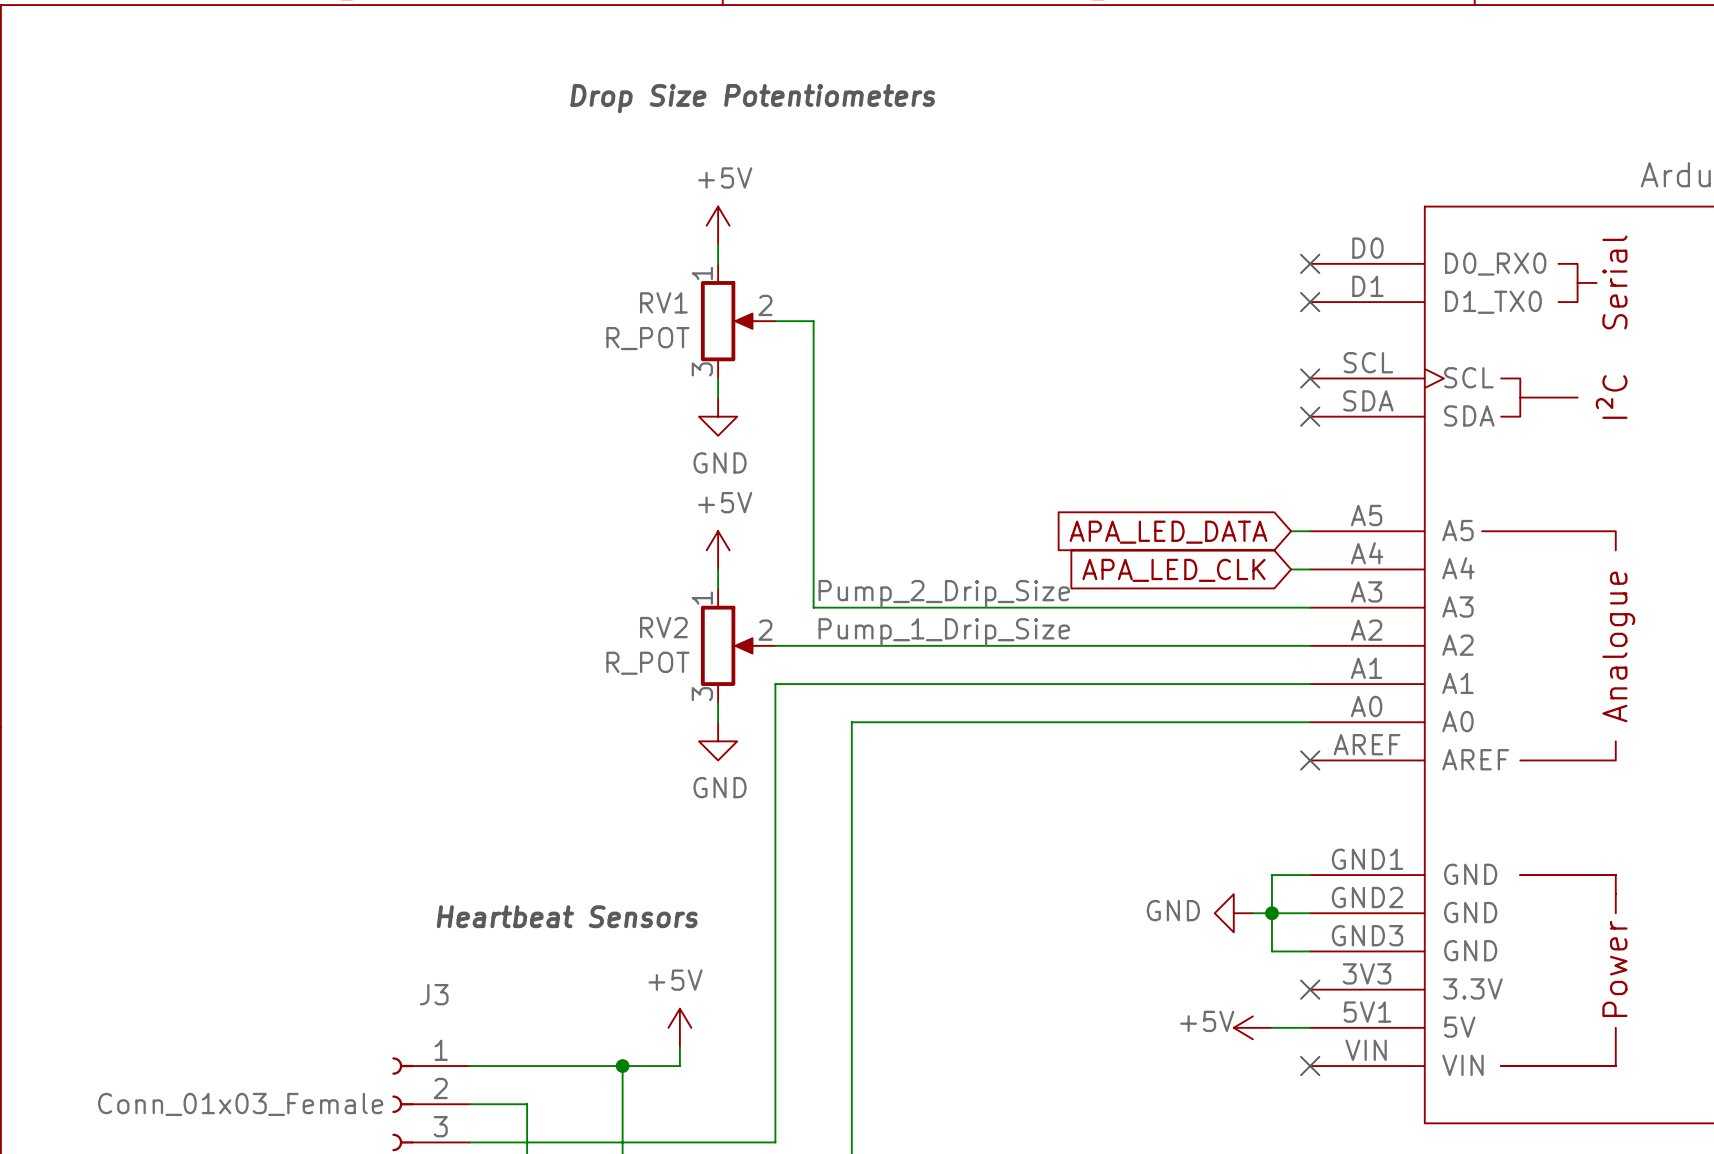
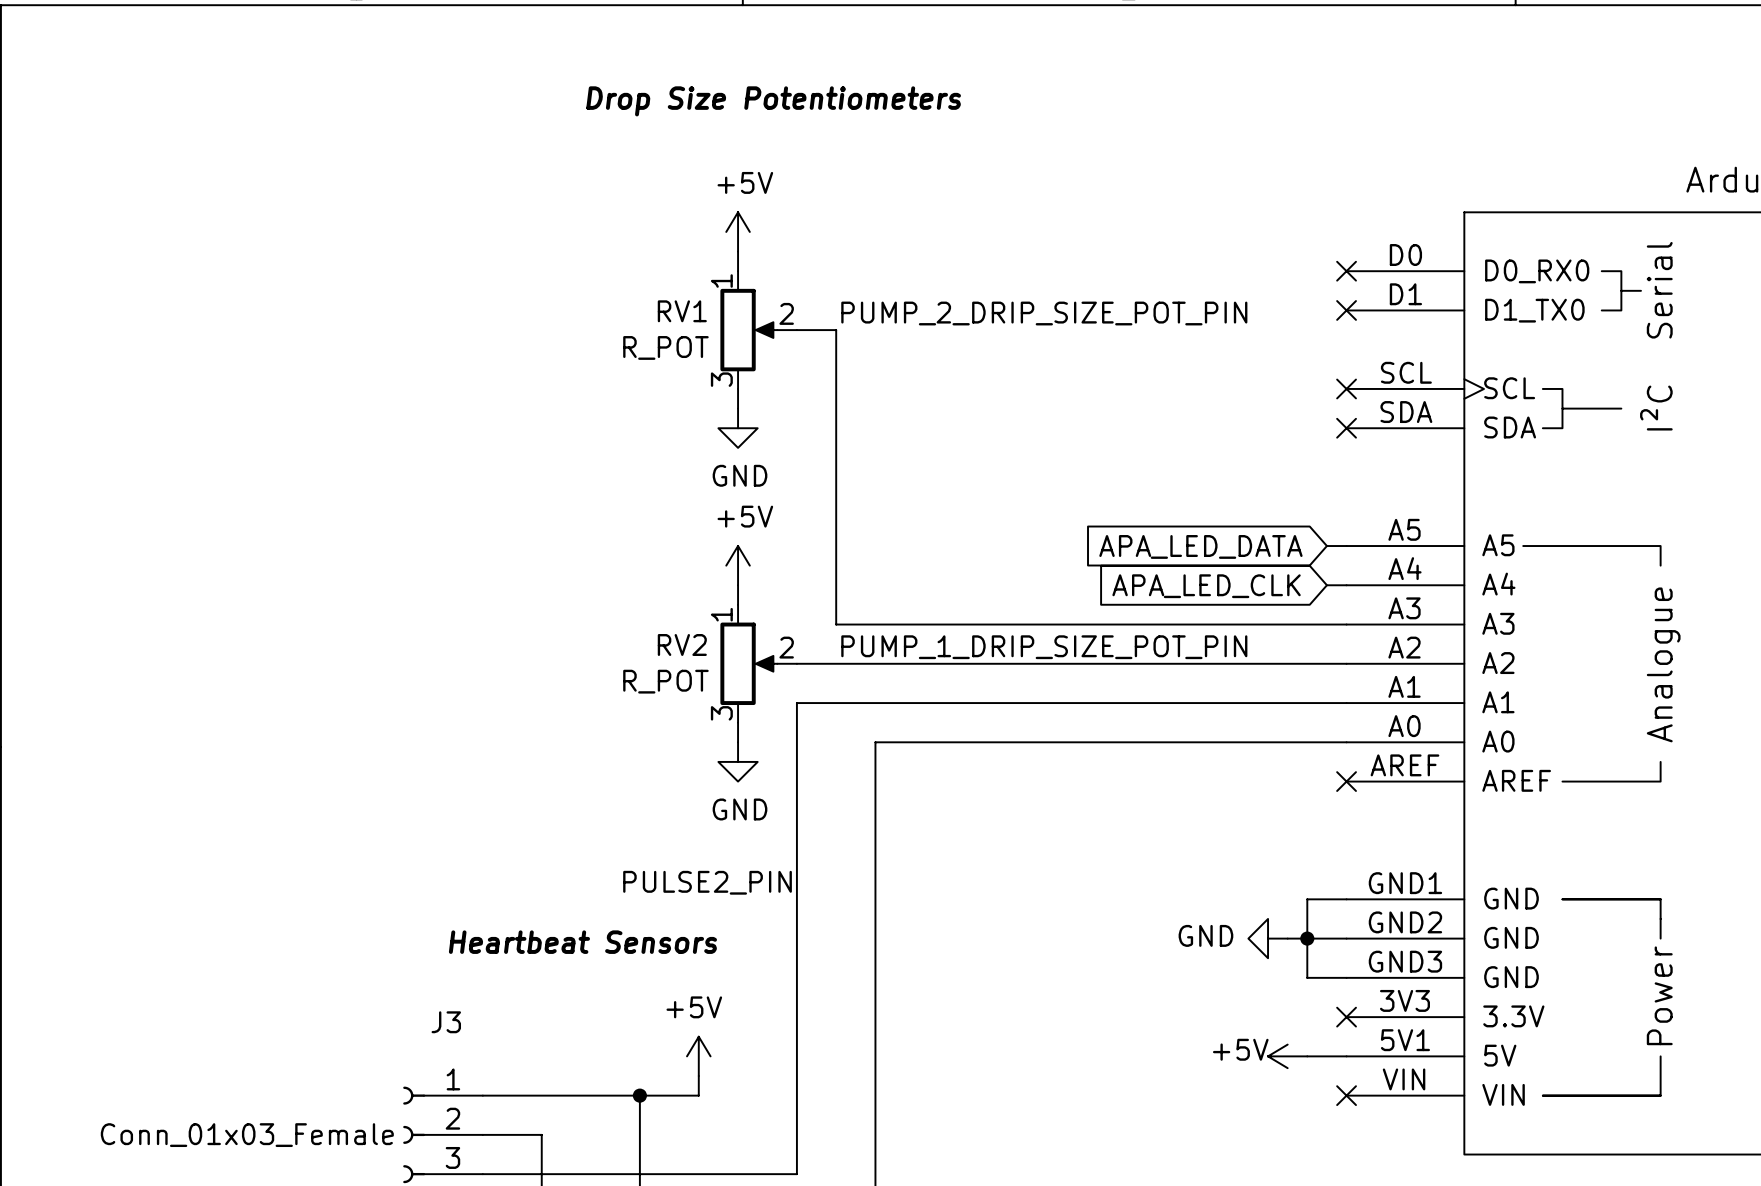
label: none -> PUMP_2_DRIP_SIZE_POT_PIN (1044, 313)
label: Pump_2_Drip_Size (944, 593) -> none
label: Pump_1_Drip_Size (944, 632) -> PUMP_1_DRIP_SIZE_POT_PIN (1044, 647)
label: none -> PULSE2_PIN (707, 882)

